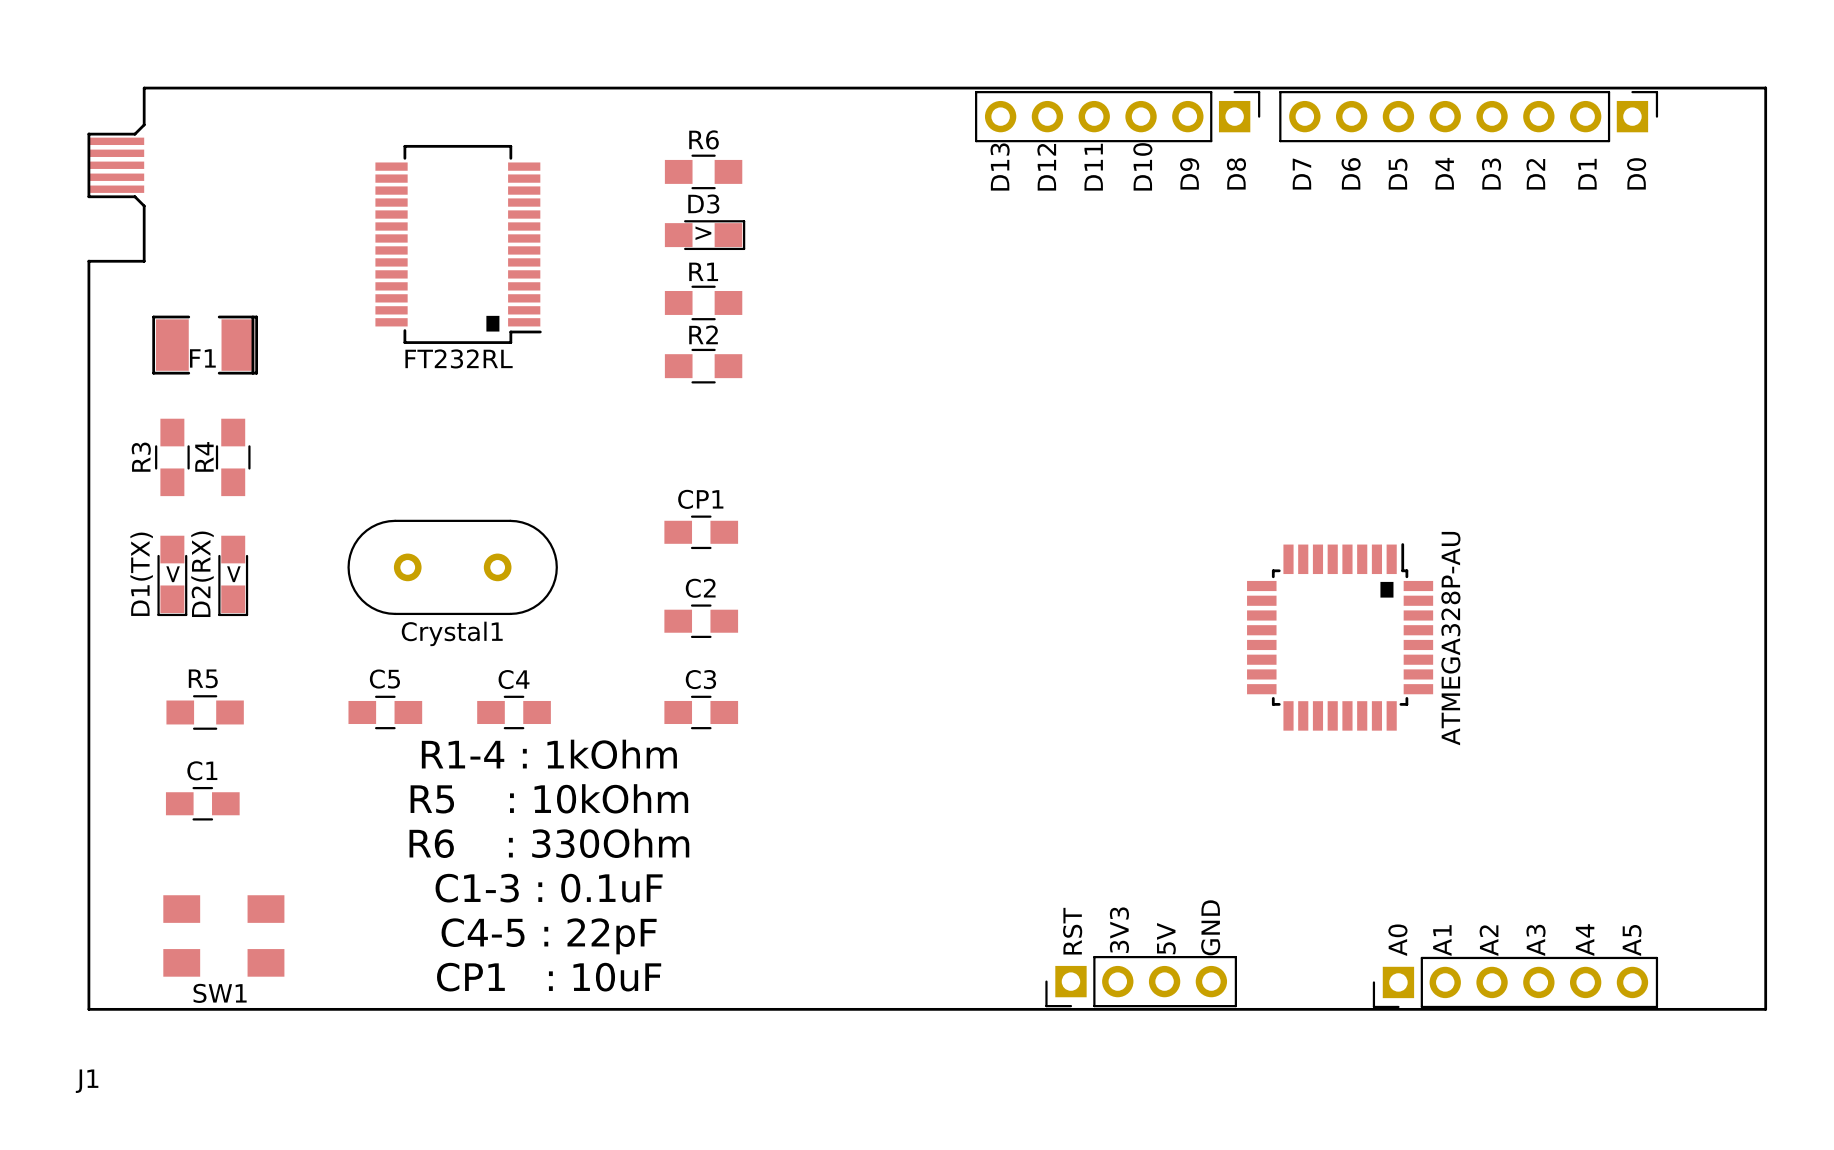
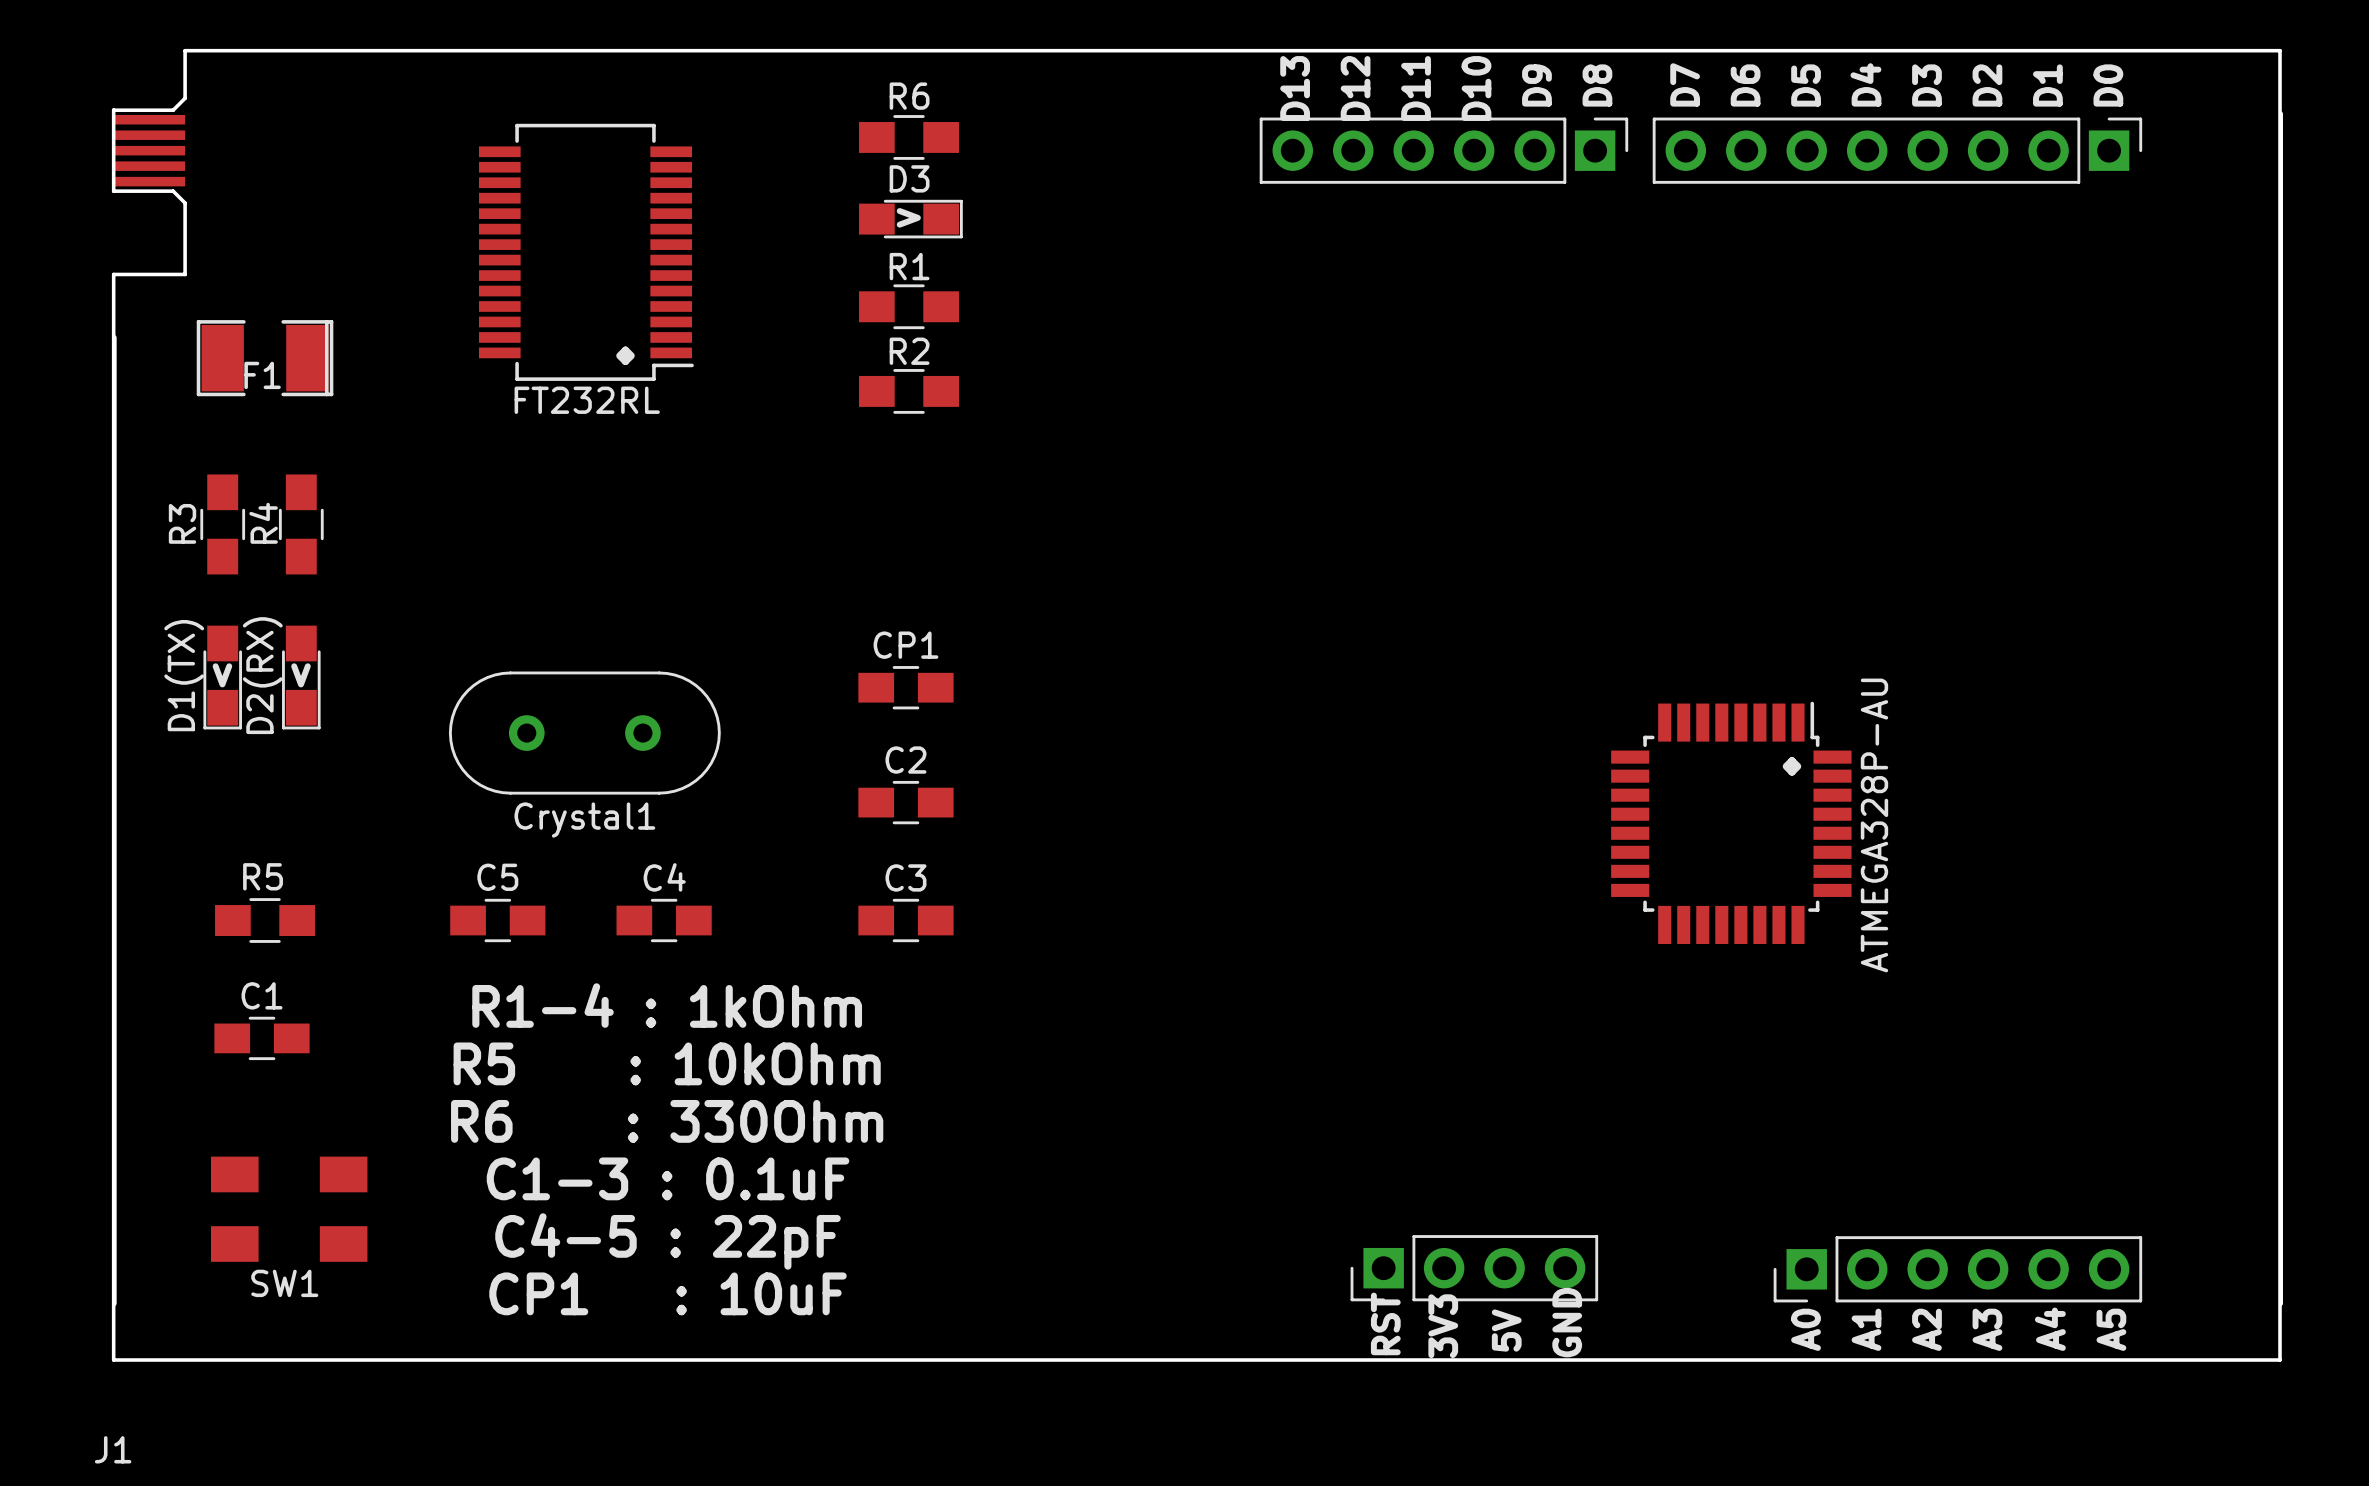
board edge: none -> (113, 109) (113, 191) (173, 191) (185, 203) (185, 274) (113, 274) (113, 1360) (2280, 1360) (2280, 50) (185, 50) (185, 98) (173, 110) (113, 110)
board edge: (1765, 88) (144, 88) (144, 124) (134, 134) (88, 134) -> none
board edge: (88, 133) (88, 196) (134, 196) (144, 205) (144, 261) (88, 261) -> none
J1 position: (116, 165) -> (149, 150)
text position: D10 (1142, 166) -> D10 (1476, 88)
text position: D13 (1000, 167) -> D13 (1295, 88)
text position: D12 (1046, 167) -> D12 (1355, 88)
text position: D11 (1093, 167) -> D11 (1416, 88)
R6 position: (703, 171) -> (909, 137)
text position: D9 (1189, 173) -> D9 (1536, 85)
text position: D8 (1236, 173) -> D8 (1597, 85)
text position: D6 (1351, 173) -> D6 (1745, 85)
text position: D4 (1444, 173) -> D4 (1865, 84)
text position: D0 (1636, 173) -> D0 (2108, 85)
text position: D7 (1301, 174) -> D7 (1685, 84)
text position: D5 (1398, 174) -> D5 (1806, 85)
text position: D3 (1491, 174) -> D3 (1926, 85)
text position: D2 (1535, 174) -> D2 (1987, 85)
text position: D1 (1587, 174) -> D1 (2047, 85)
text position: > (703, 233) -> > (908, 217)
D3 position: (705, 235) -> (910, 219)
R1: none -> (909, 306)
FT232RL position: (458, 244) -> (586, 252)
R1 name: R1 (703, 271) -> R2 (909, 351)
text position: . (492, 323) -> . (625, 355)
F1 position: (205, 345) -> (265, 358)
R2: (703, 366) -> none
R3 position: (172, 457) -> (222, 524)
R4 position: (233, 457) -> (301, 524)
text: none -> > (222, 675)
text: none -> > (300, 675)
text: > (173, 574) -> none
text: > (233, 574) -> none
D1(TX) position: (172, 575) -> (222, 677)
D2(RX) position: (233, 575) -> (301, 677)
text position: R1-4 : 1kOhm (549, 754) -> R1-4 : 1kOhm (667, 1005)
text position: R5 : 10kOhm (549, 798) -> R5 : 10kOhm (667, 1063)
text position: R6 : 330Ohm (549, 843) -> R6 : 330Ohm (667, 1121)
text position: C1-3 : 0.1uF (549, 888) -> C1-3 : 0.1uF (668, 1178)
text position: GND (1210, 927) -> GND (1567, 1322)
text position: 3V3 (1119, 930) -> 3V3 (1443, 1326)
text position: RST (1072, 931) -> RST (1385, 1323)
text position: C4-5 : 22pF (549, 936) -> C4-5 : 22pF (668, 1241)
text position: 5V (1166, 938) -> 5V (1506, 1330)
text position: A0 (1397, 940) -> A0 (1806, 1329)
text position: A1 (1442, 940) -> A1 (1866, 1329)
text position: A2 (1489, 940) -> A2 (1926, 1329)
text position: A3 (1535, 940) -> A3 (1987, 1329)
text position: A4 (1585, 940) -> A4 (2050, 1329)
text position: A5 (1632, 940) -> A5 (2111, 1329)
text position: CP1 : 10uF (549, 977) -> CP1 : 10uF (668, 1293)
board edge: (88, 1009) (1765, 1009) -> none
J1 name position: J1 (87, 1081) -> J1 (113, 1449)

